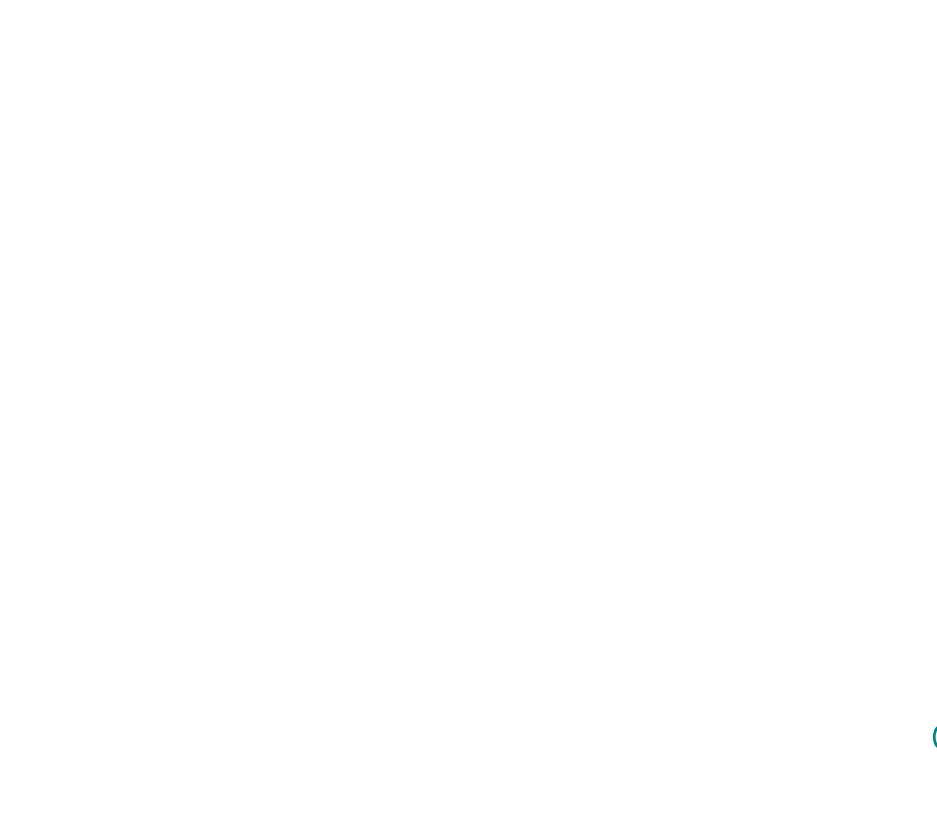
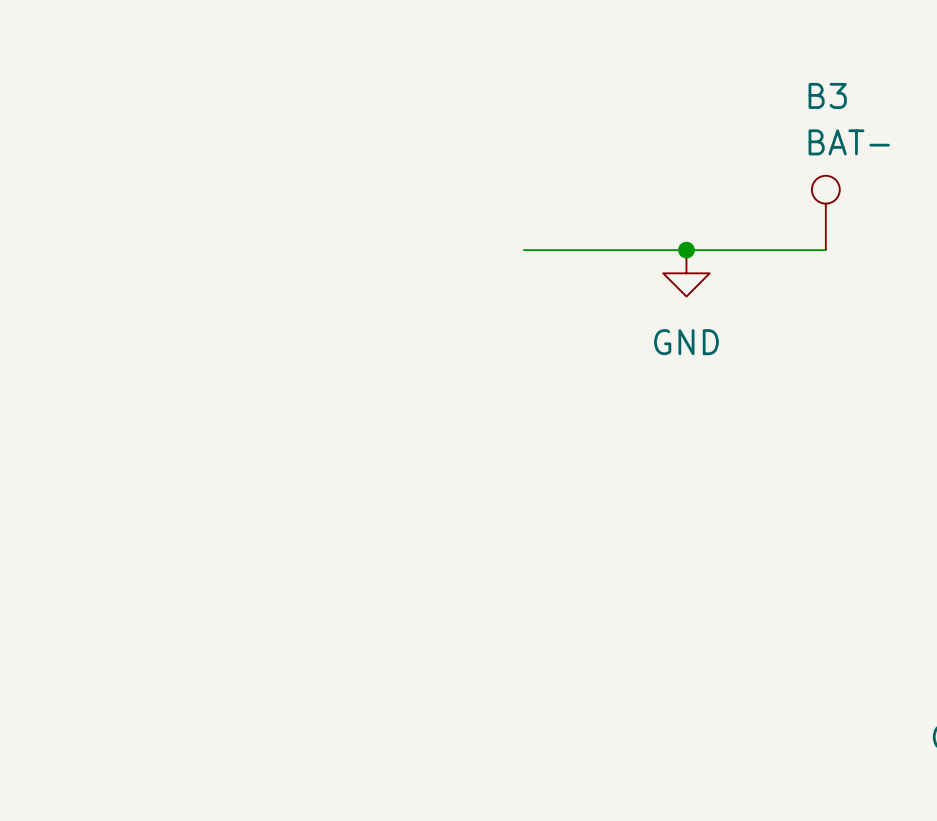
B3: none -> BAT- (825, 212)
wire: none -> (523, 250) (825, 250)
junction: none -> (686, 250)
power symbol: none -> GND (686, 273)

